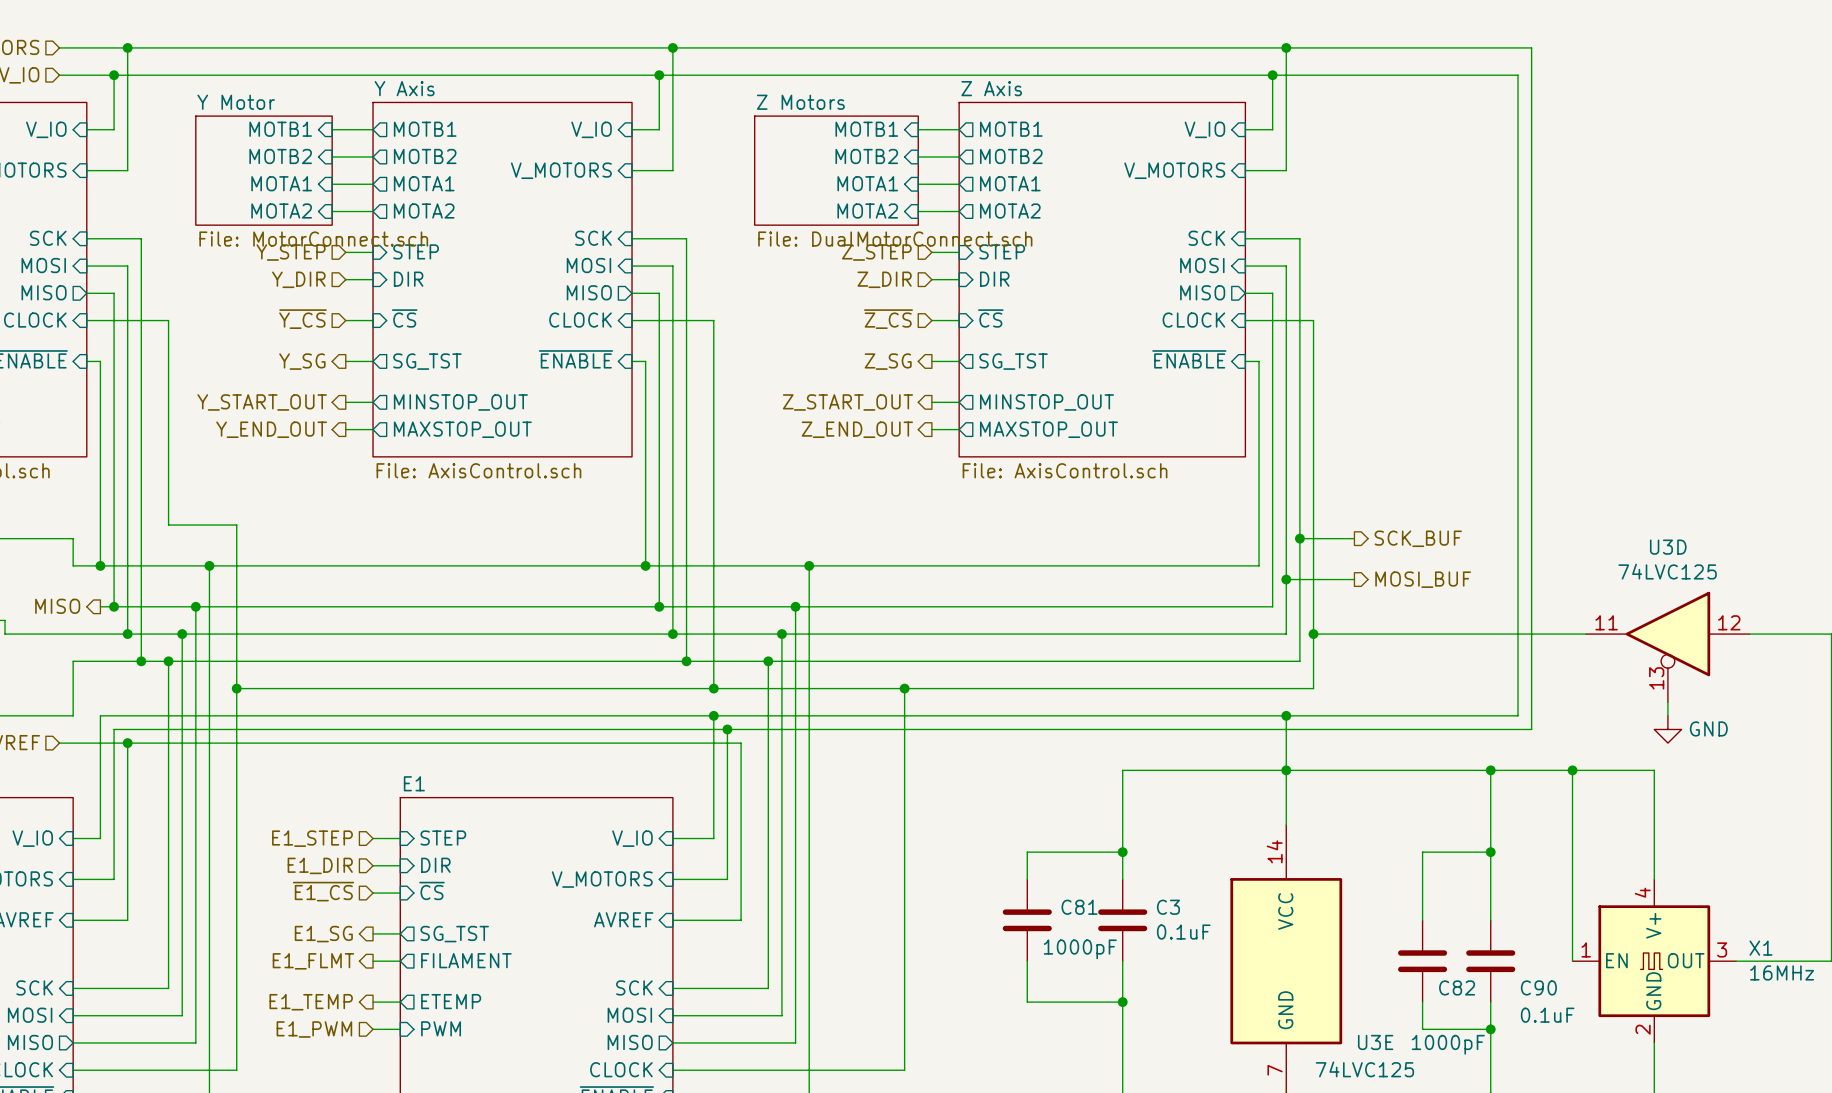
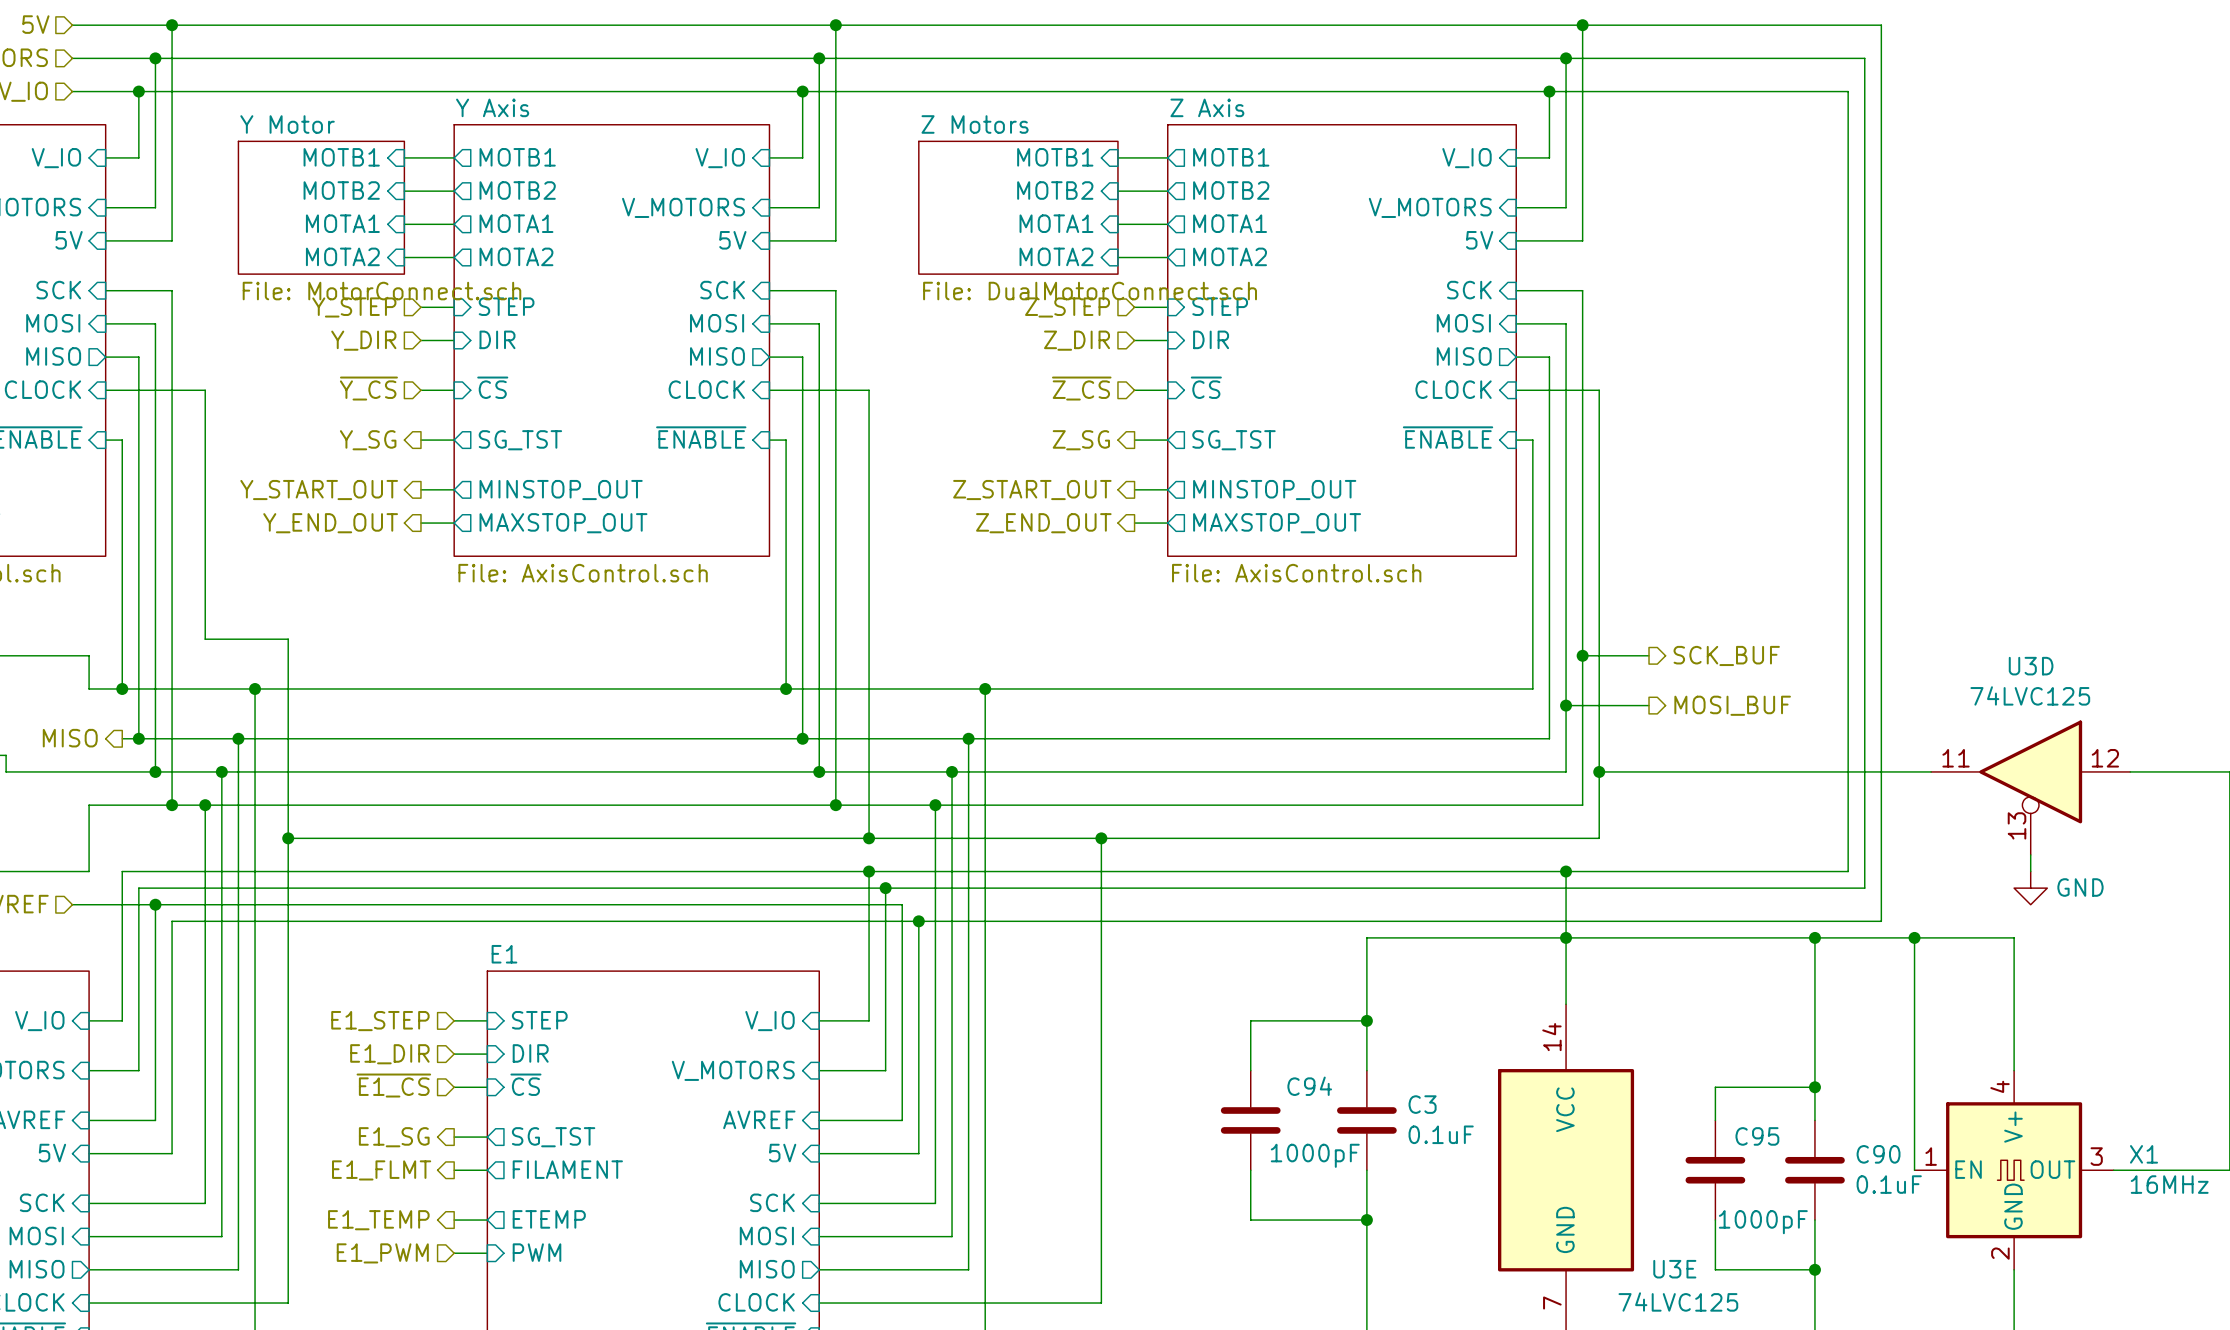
hierarchical label: none -> 5V (35, 24)
wire: none -> (72, 25) (1881, 25) (1881, 921) (172, 921) (172, 1153) (89, 1153)
wire: none -> (172, 25) (172, 240) (105, 240)
junction: none -> (172, 25)
wire: none -> (835, 25) (835, 240) (769, 240)
junction: none -> (835, 25)
wire: none -> (1582, 25) (1582, 240) (1516, 240)
junction: none -> (1582, 25)
sheet pin: none -> 5V (69, 240)
sheet pin: none -> 5V (732, 240)
sheet pin: none -> 5V (1479, 240)
wire: none -> (918, 921) (918, 1153) (819, 1153)
junction: none -> (918, 921)
wire: (1027, 852) (1122, 852) -> (1250, 1037) (1250, 1020) (1366, 1020)
junction position: (1122, 852) -> (1366, 1020)
wire: (1490, 852) (1422, 852) (1422, 920) -> none
junction position: (1490, 852) -> (1814, 1087)
wire: none -> (1814, 1087) (1715, 1087) (1715, 1120)
C81 name: C81 (1079, 907) -> C94 (1309, 1086)
sheet pin: none -> 5V (52, 1153)
sheet pin: none -> 5V (782, 1153)
C95: none -> 1000pF (1715, 1170)
C82: 1000pF (1422, 961) -> none
C90 name position: C90 (1538, 987) -> C90 (1878, 1154)
wire: none -> (1715, 1220) (1715, 1269) (1814, 1269)
wire: (1422, 1002) (1422, 1029) (1490, 1029) -> none
C90 value position: 0.1uF (1547, 1015) -> 0.1uF (1889, 1184)
junction position: (1490, 1029) -> (1814, 1269)
U3E value position: 74LVC125 (1364, 1069) -> 74LVC125 (1678, 1301)

